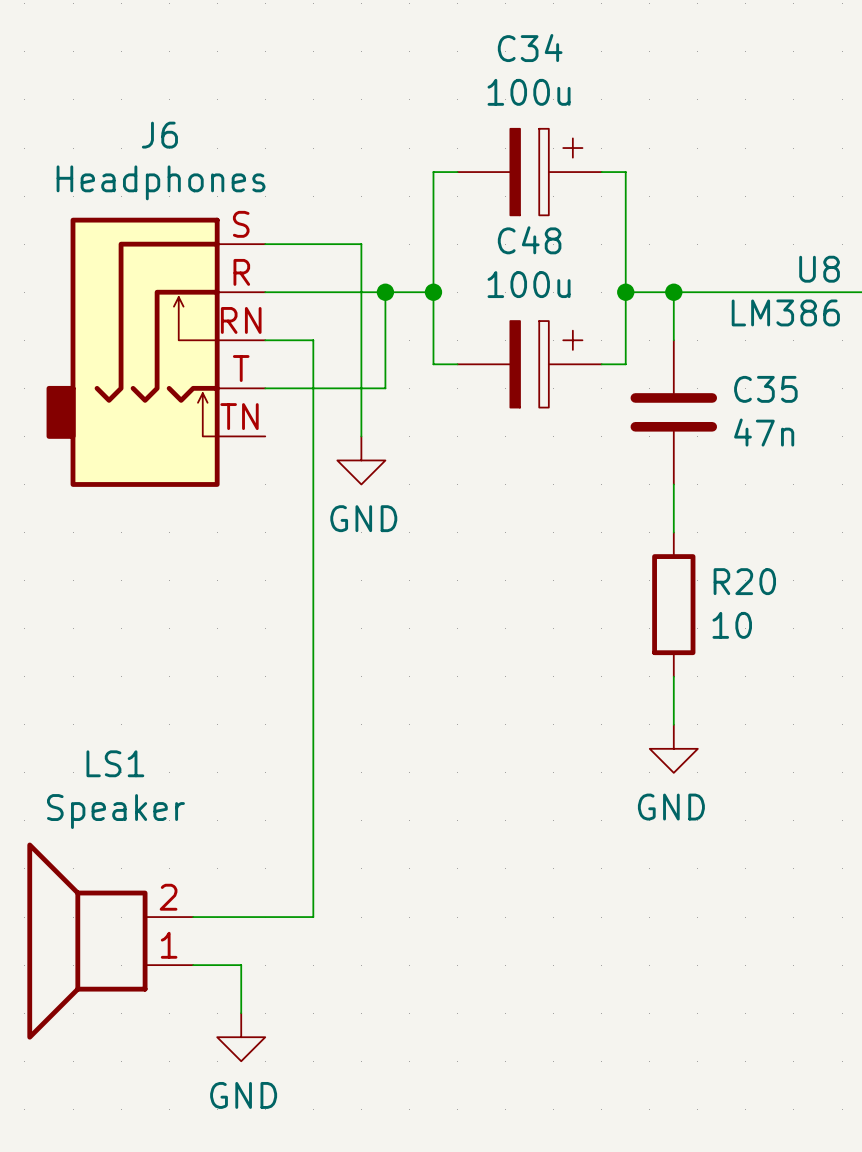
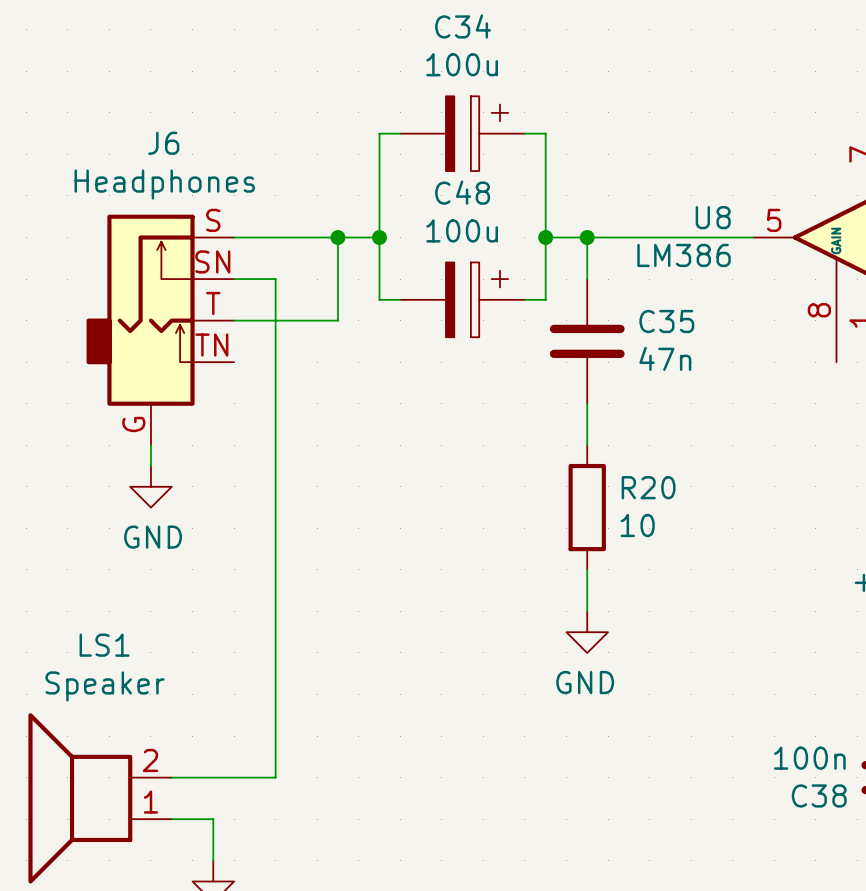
J6 symbol: [46, 217, 266, 487] -> [86, 214, 235, 446]
wire: (265, 244) (361, 244) (361, 436) -> none
power symbol position: GND (361, 460) -> GND (150, 486)
wire: none -> (150, 445) (150, 466)

